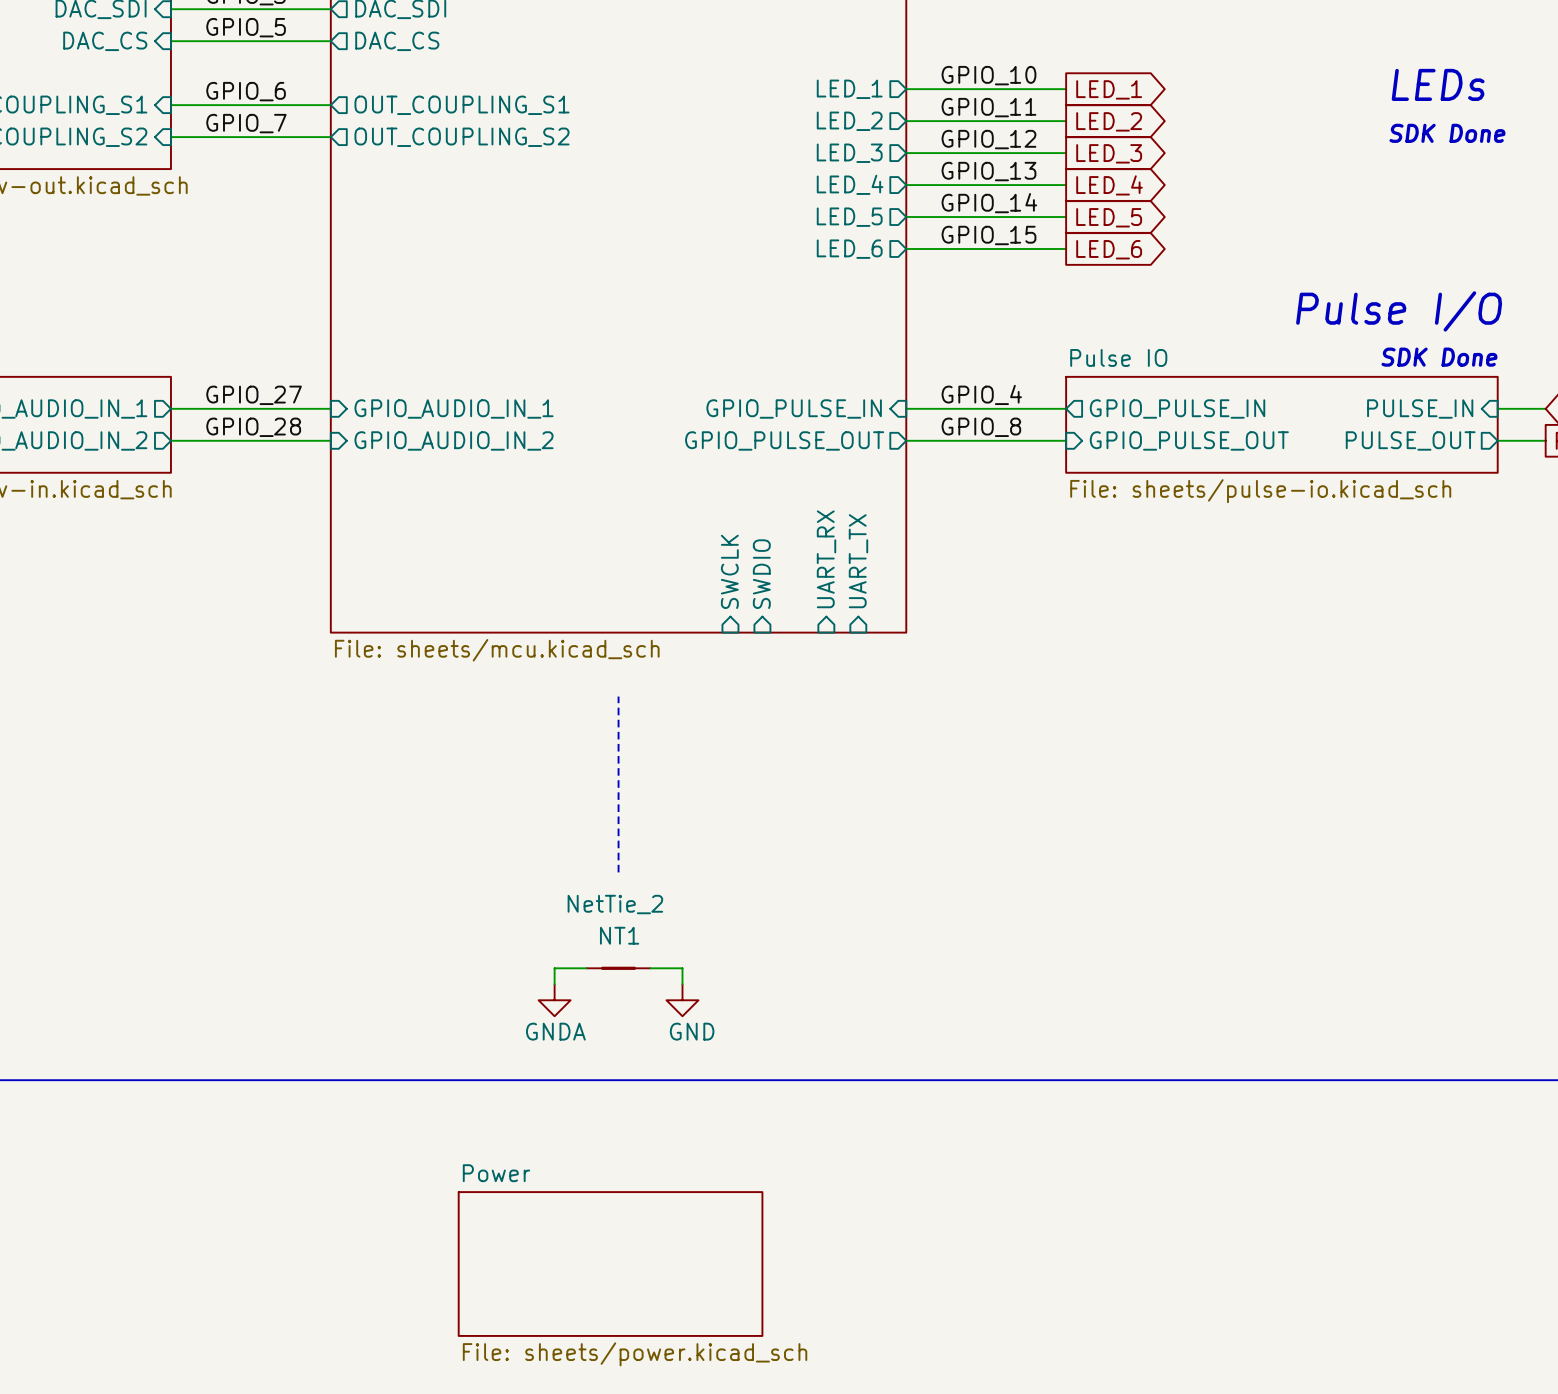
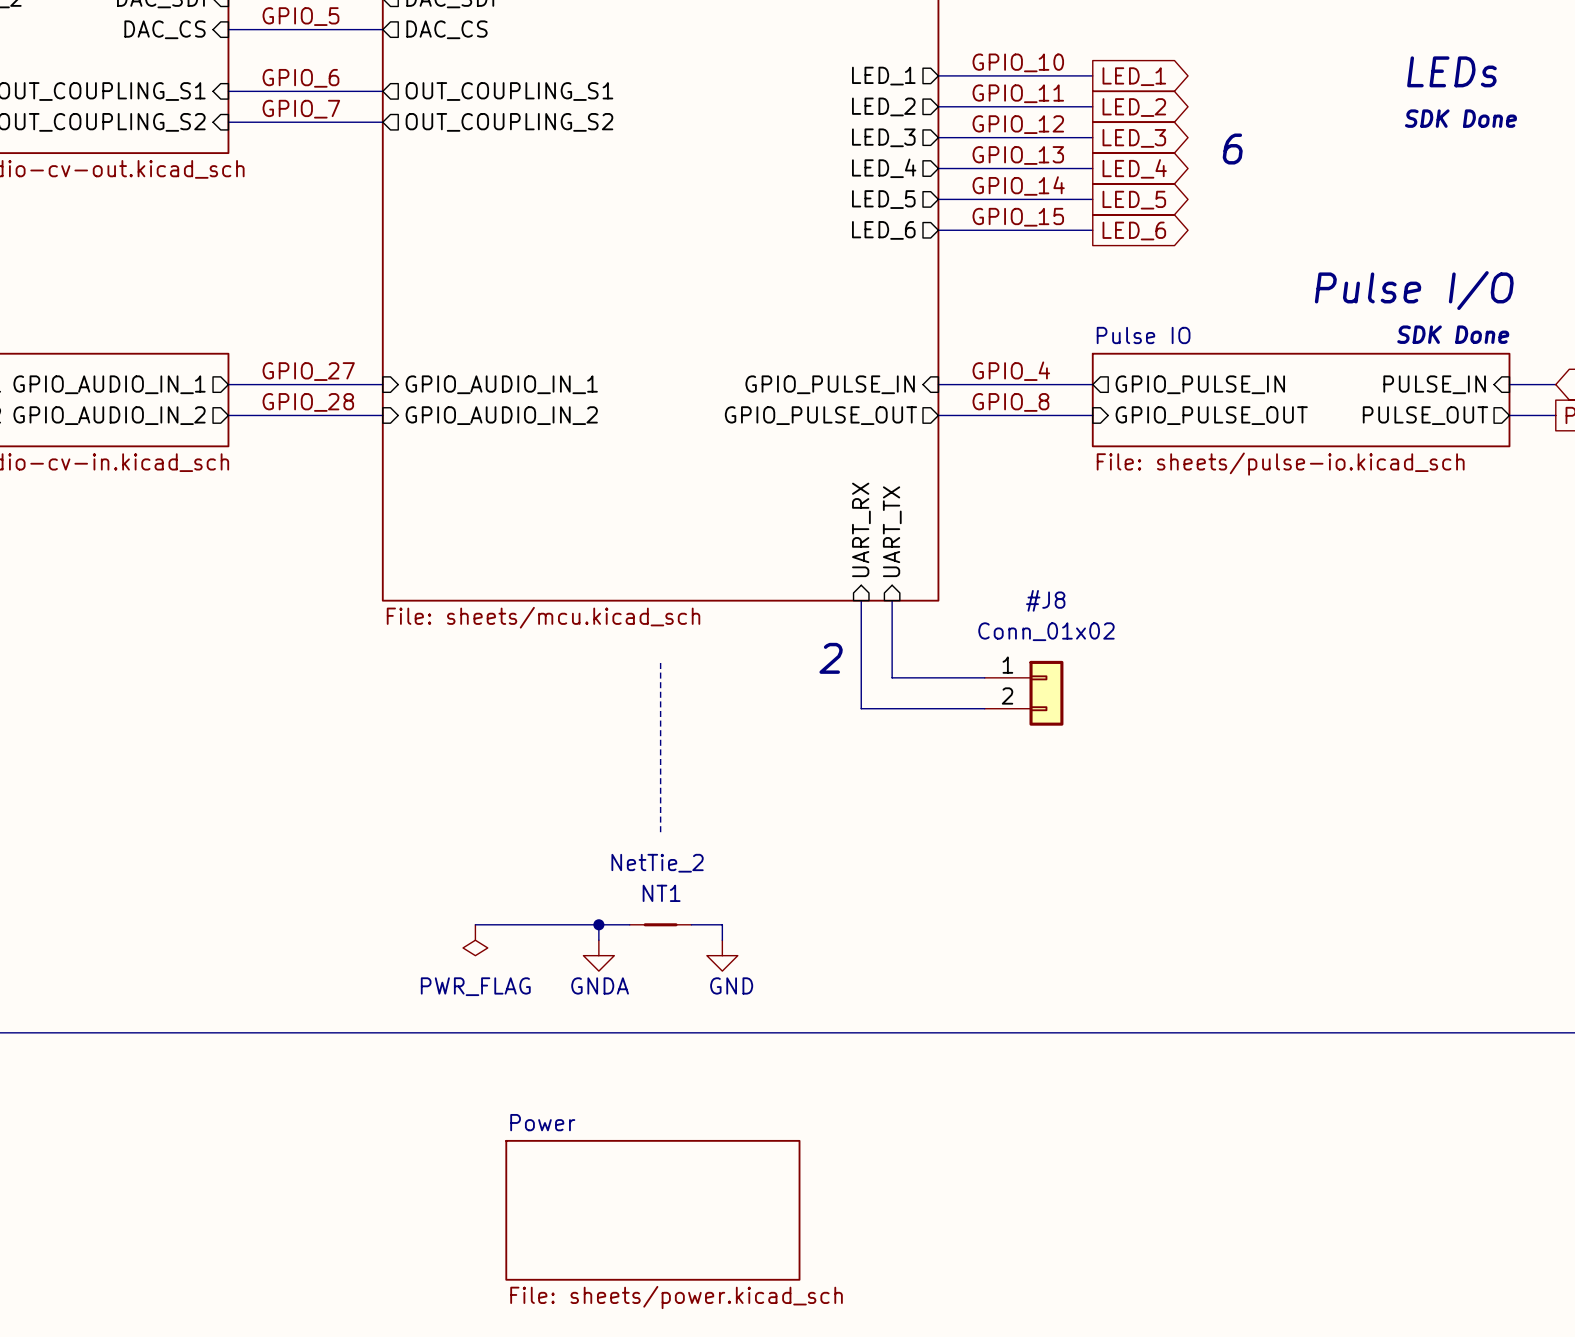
text: none -> 6 (1232, 149)
sheet pin: SWCLK (729, 571) -> none
sheet pin: SWDIO (761, 574) -> none
wire: none -> (861, 600) (861, 708) (984, 708)
wire: none -> (892, 600) (892, 677) (984, 677)
text: none -> 2 (831, 658)
#J8: none -> Conn_01x02 (1024, 693)
wire: none -> (475, 924) (598, 924)
junction: none -> (598, 924)
power symbol: none -> PWR_FLAG (475, 940)

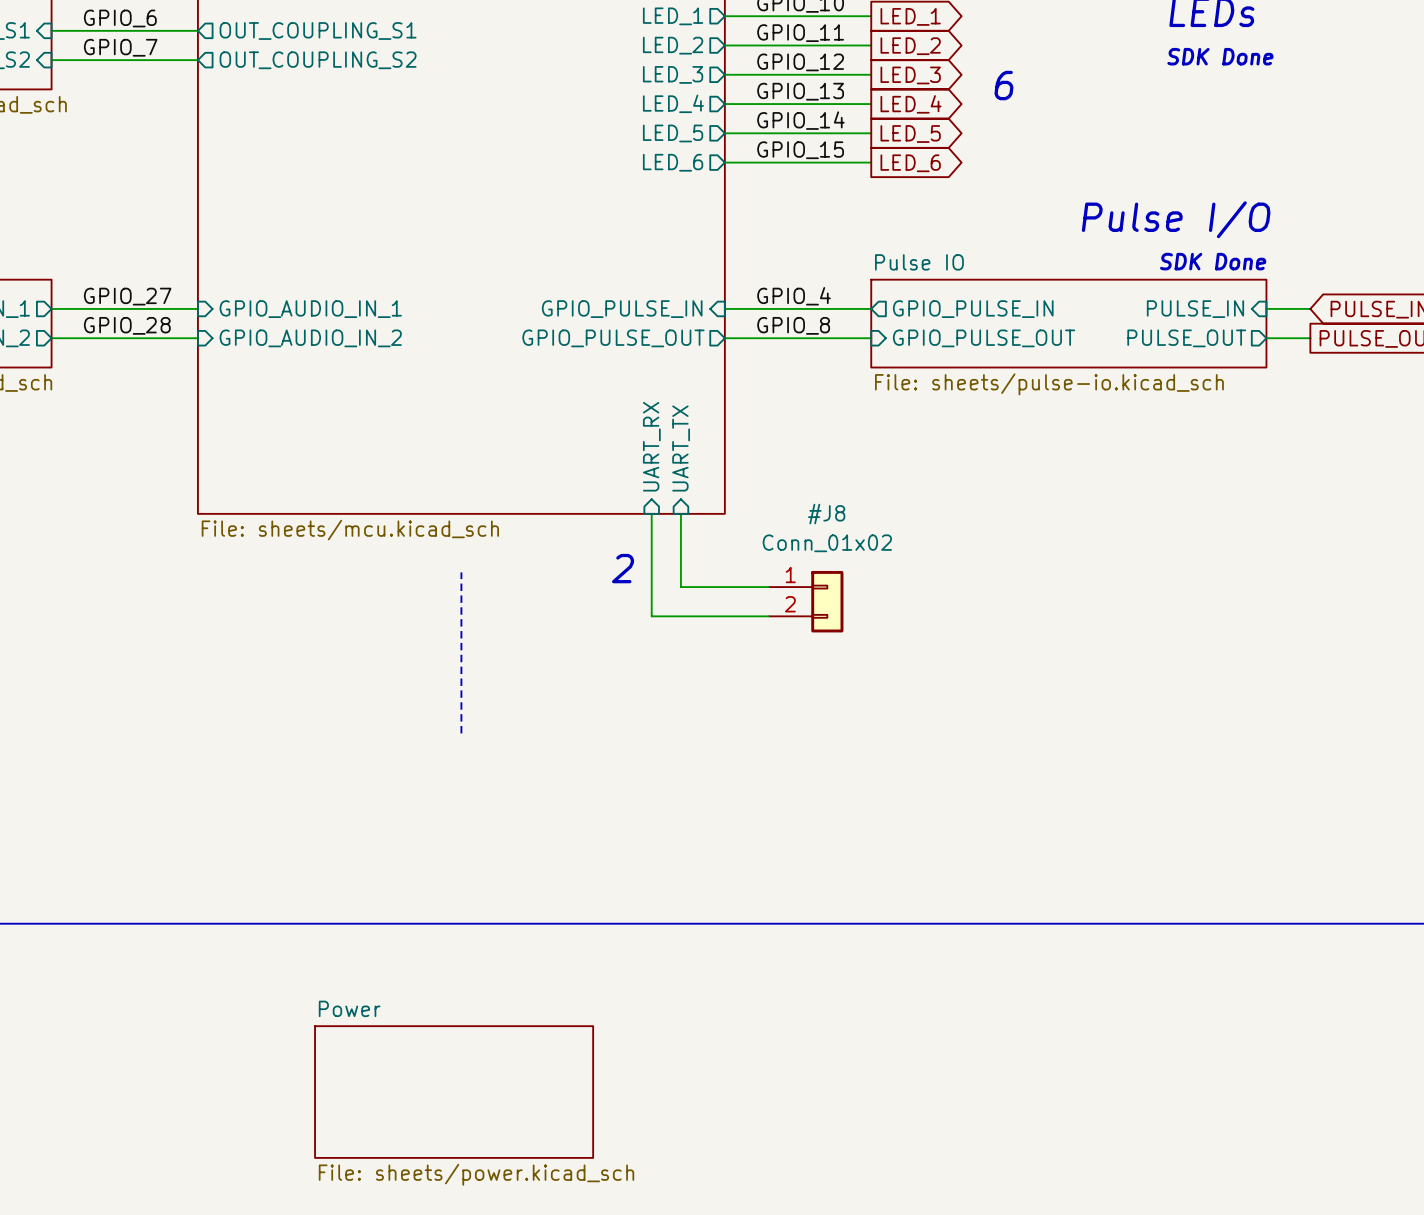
wire: (475, 924) (629, 924) -> none
wire: (598, 924) (598, 940) -> none
junction: (598, 924) -> none
NT1: NetTie_2 (660, 924) -> none
wire: (691, 924) (722, 924) (722, 940) -> none
power symbol: PWR_FLAG (475, 940) -> none
power symbol: GNDA (598, 955) -> none
power symbol: GND (722, 955) -> none

